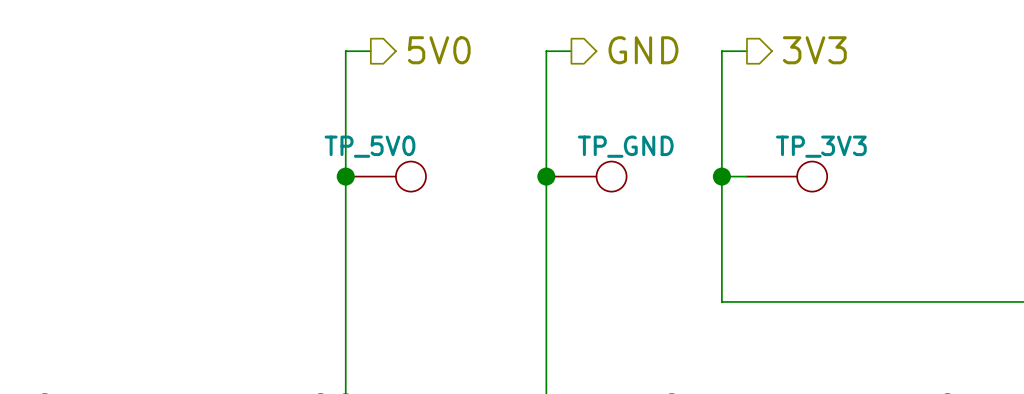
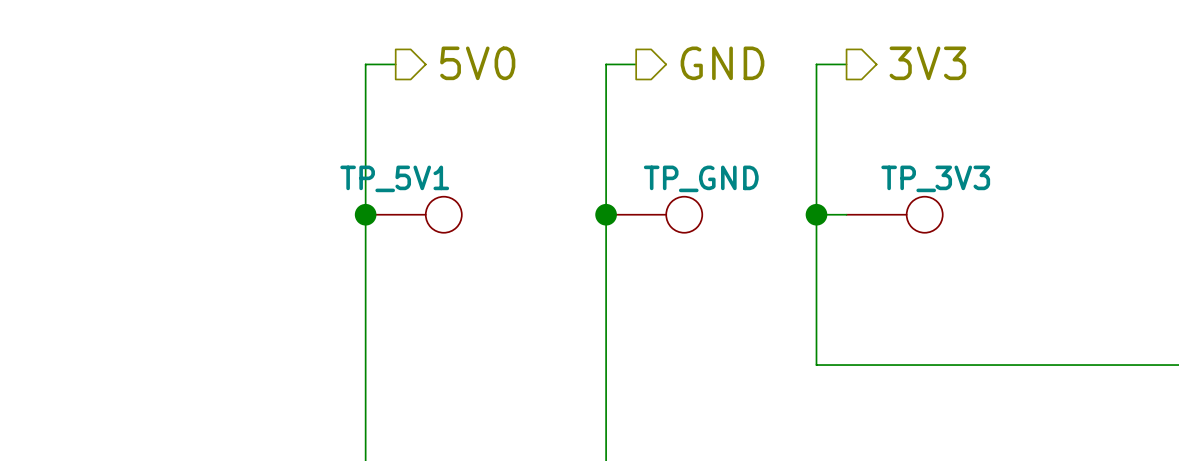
TP_5V0 name: TP_5V0 (369, 146) -> TP_5V1 (394, 178)

